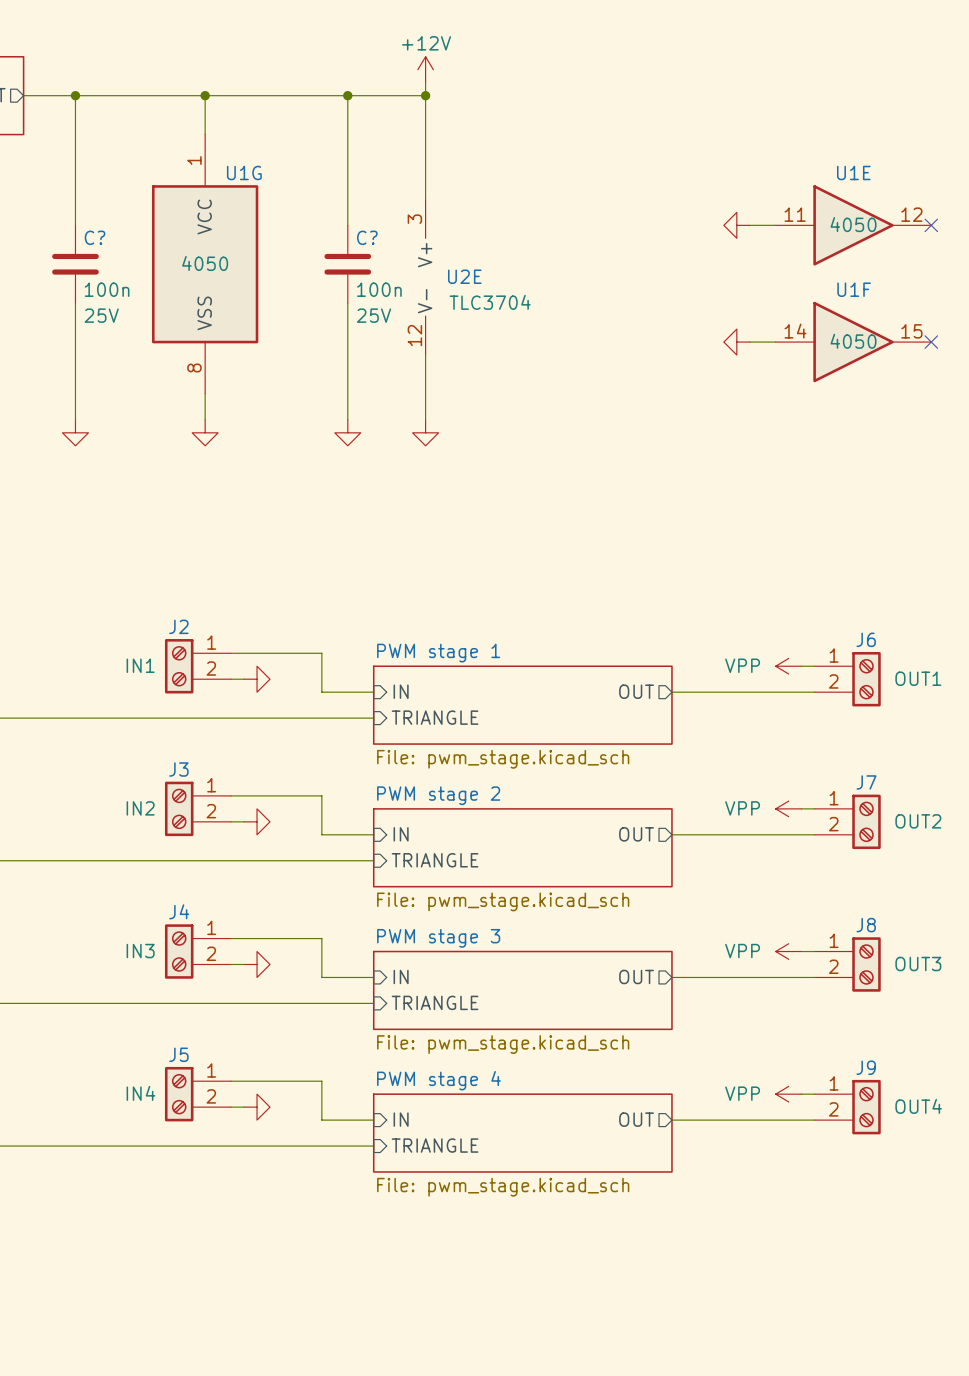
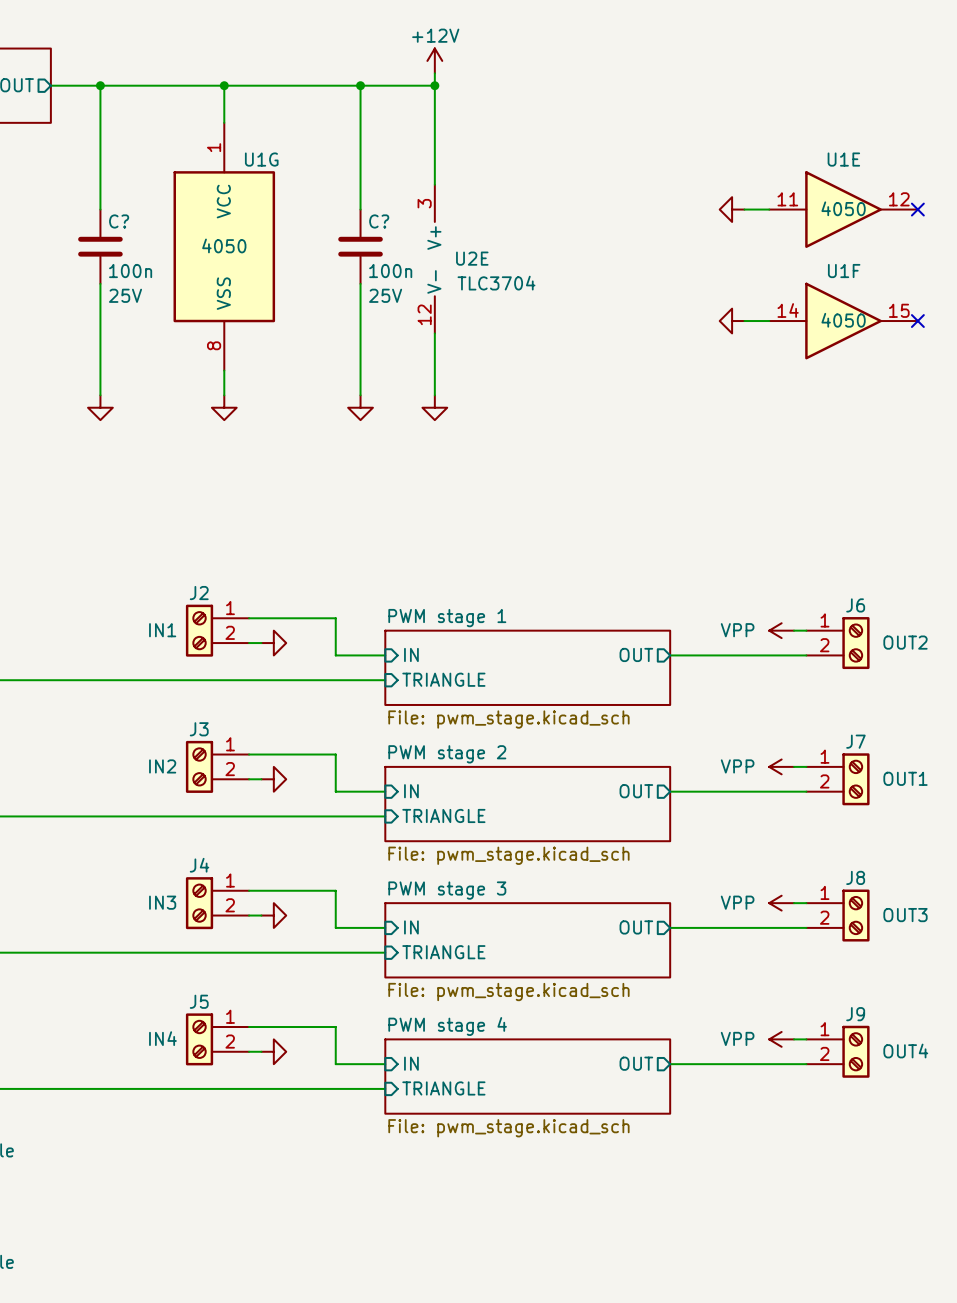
J6 text: OUT1 (918, 678) -> OUT2 (905, 642)
J7 text: OUT2 (918, 821) -> OUT1 (905, 778)

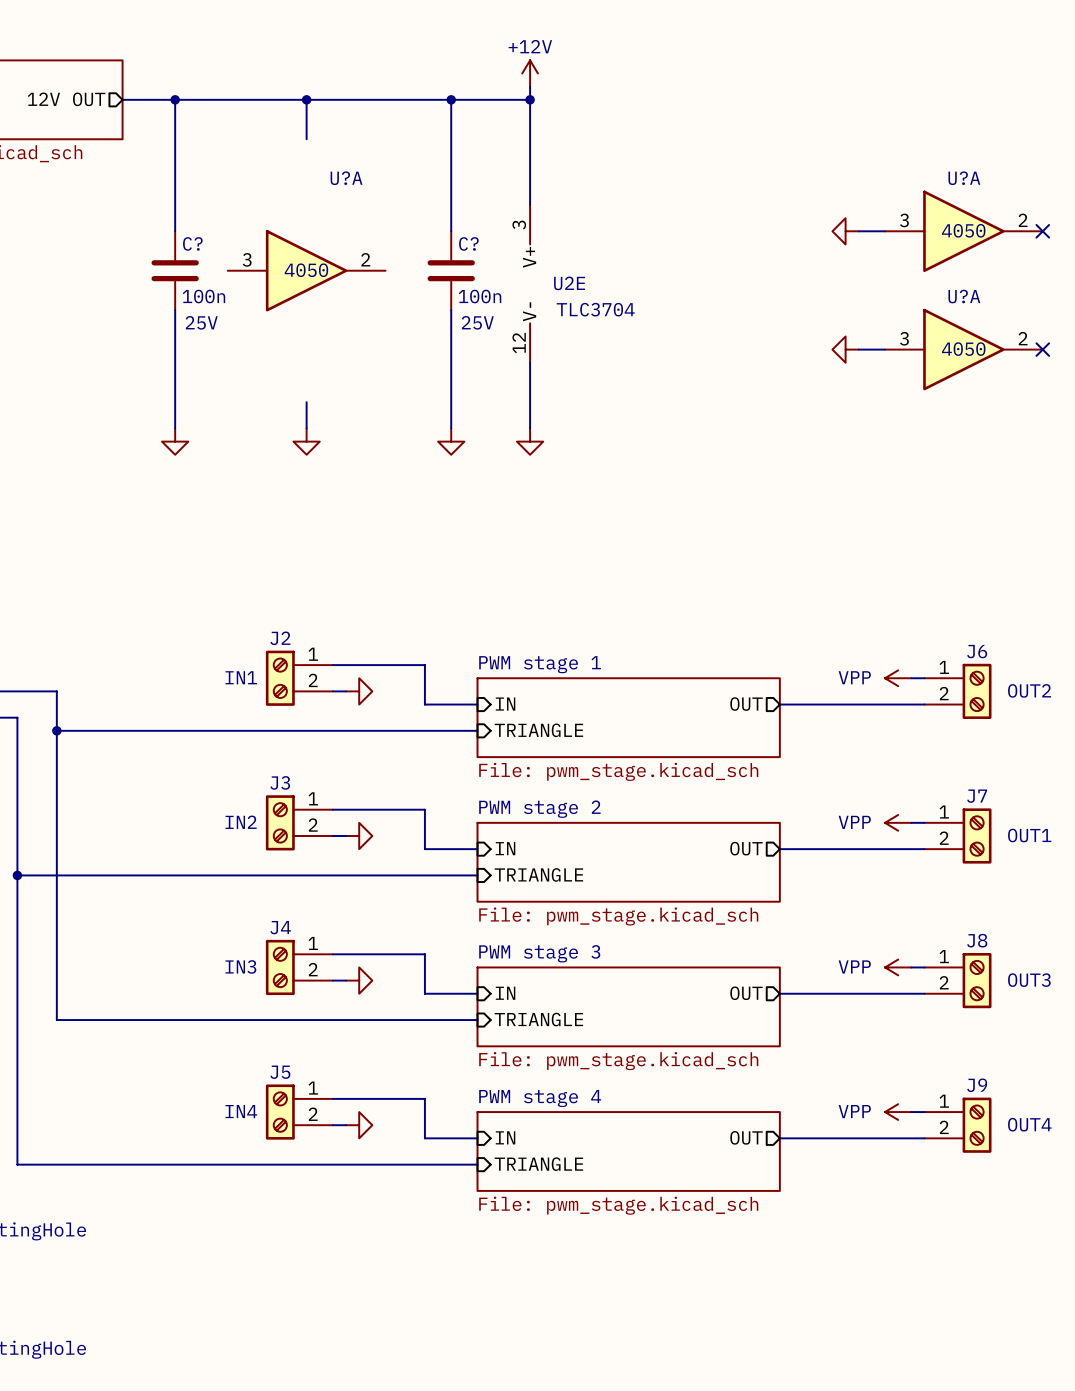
U1E name: U1E (843, 159) -> U?A (964, 178)
U1E pin number: 11 (787, 199) -> 3 (904, 220)
U1E pin number: 12 (899, 199) -> 2 (1023, 220)
U1G: 4050 (224, 246) -> none
U?A: none -> 4050 (306, 270)
U1F name: U1F (844, 271) -> U?A (964, 296)
U1F pin number: 14 (788, 310) -> 3 (904, 338)
U1F pin number: 15 (899, 310) -> 2 (1023, 338)

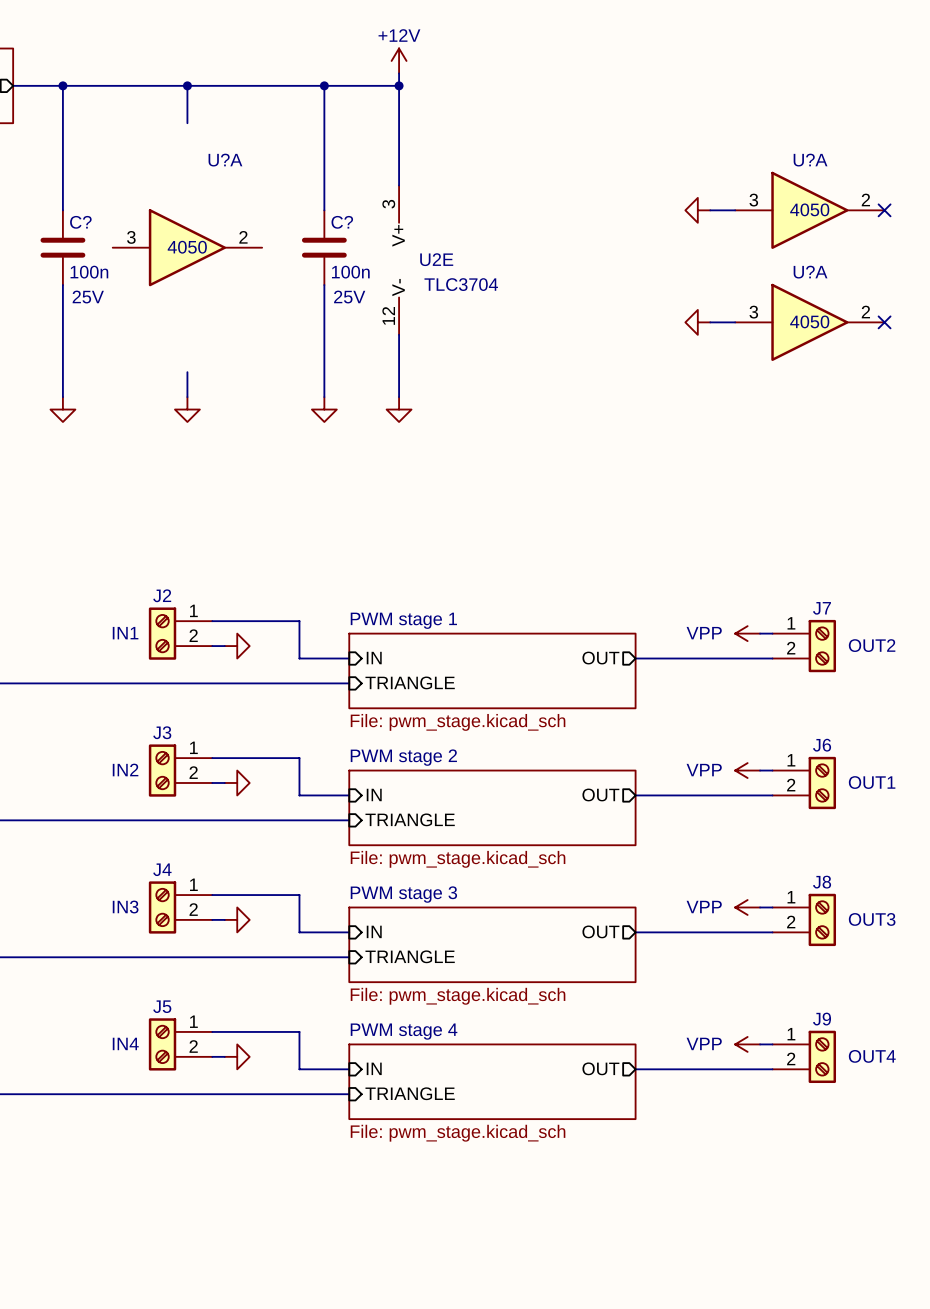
J6 name: J6 (977, 651) -> J7 (822, 608)
J7 name: J7 (977, 796) -> J6 (822, 745)

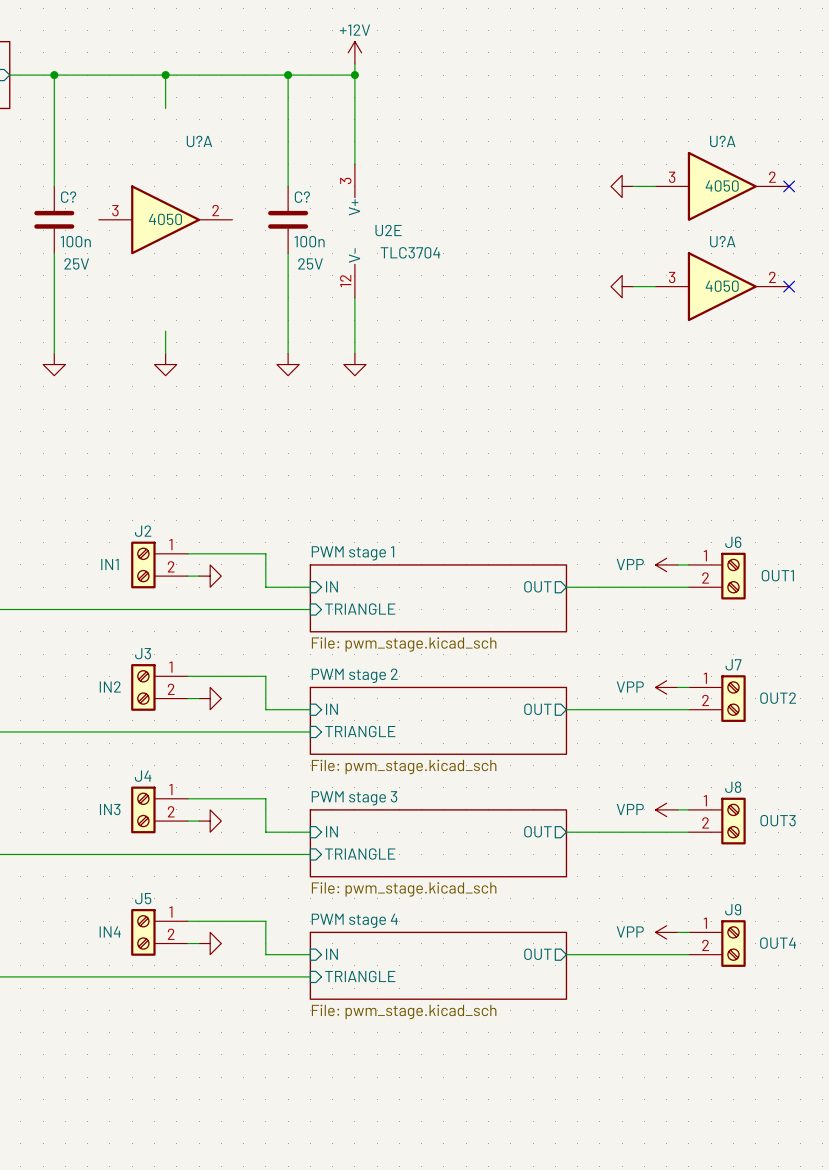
J7 name: J7 (822, 608) -> J6 (733, 542)
J7 text: OUT2 (872, 645) -> OUT1 (777, 575)
J6 name: J6 (822, 745) -> J7 (733, 664)
J6 text: OUT1 (872, 782) -> OUT2 (778, 698)

